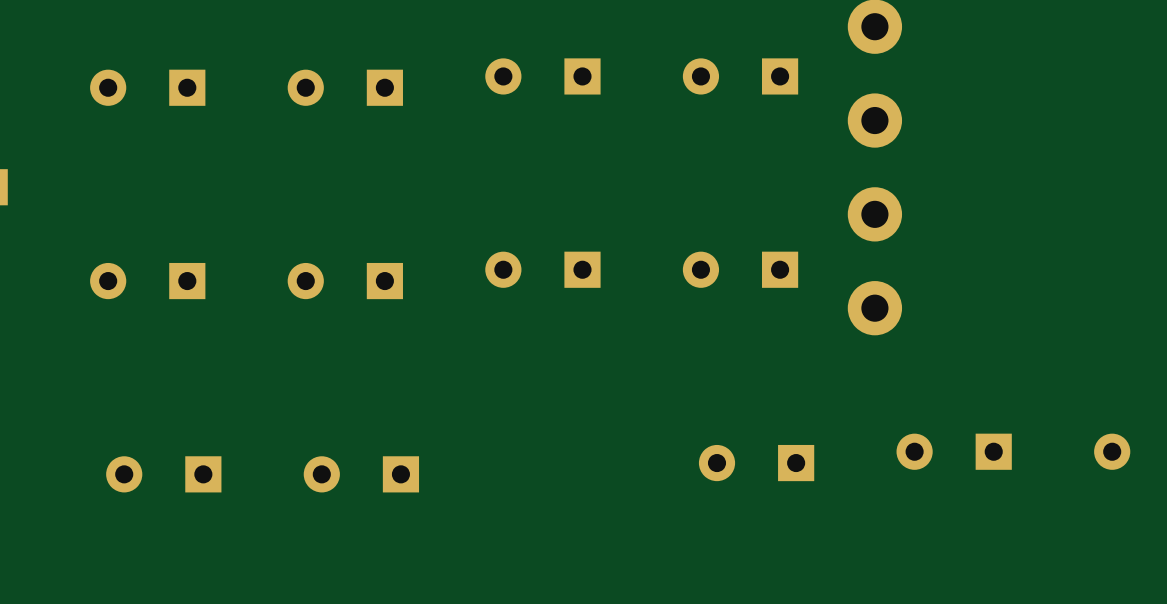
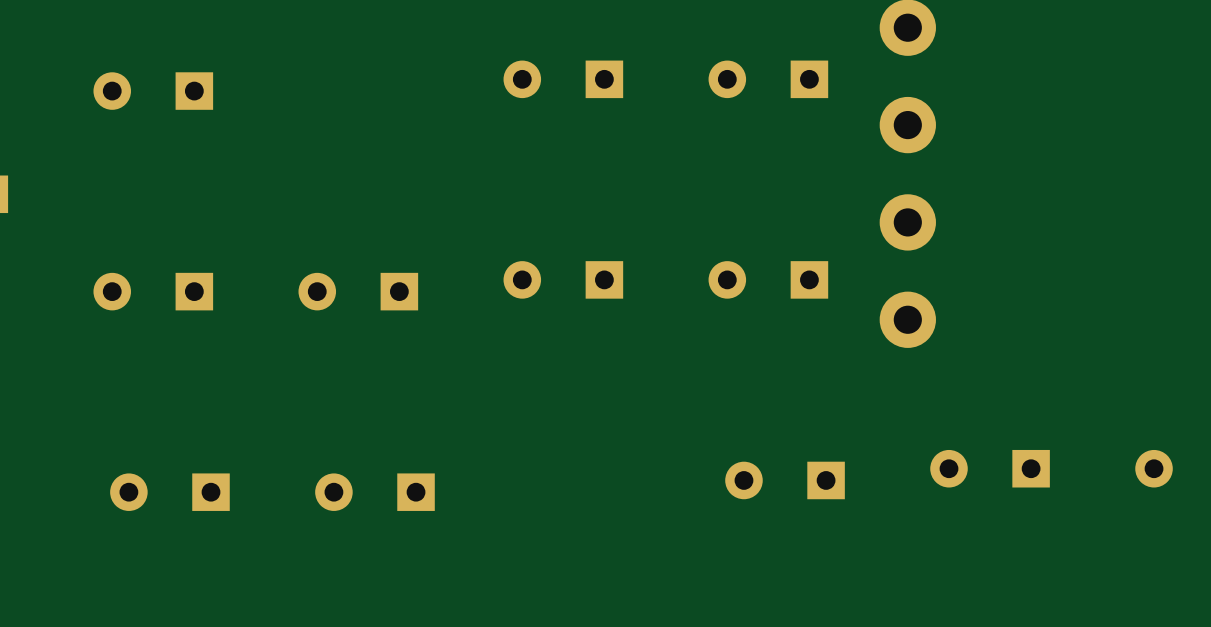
part: (345, 87) -> none

